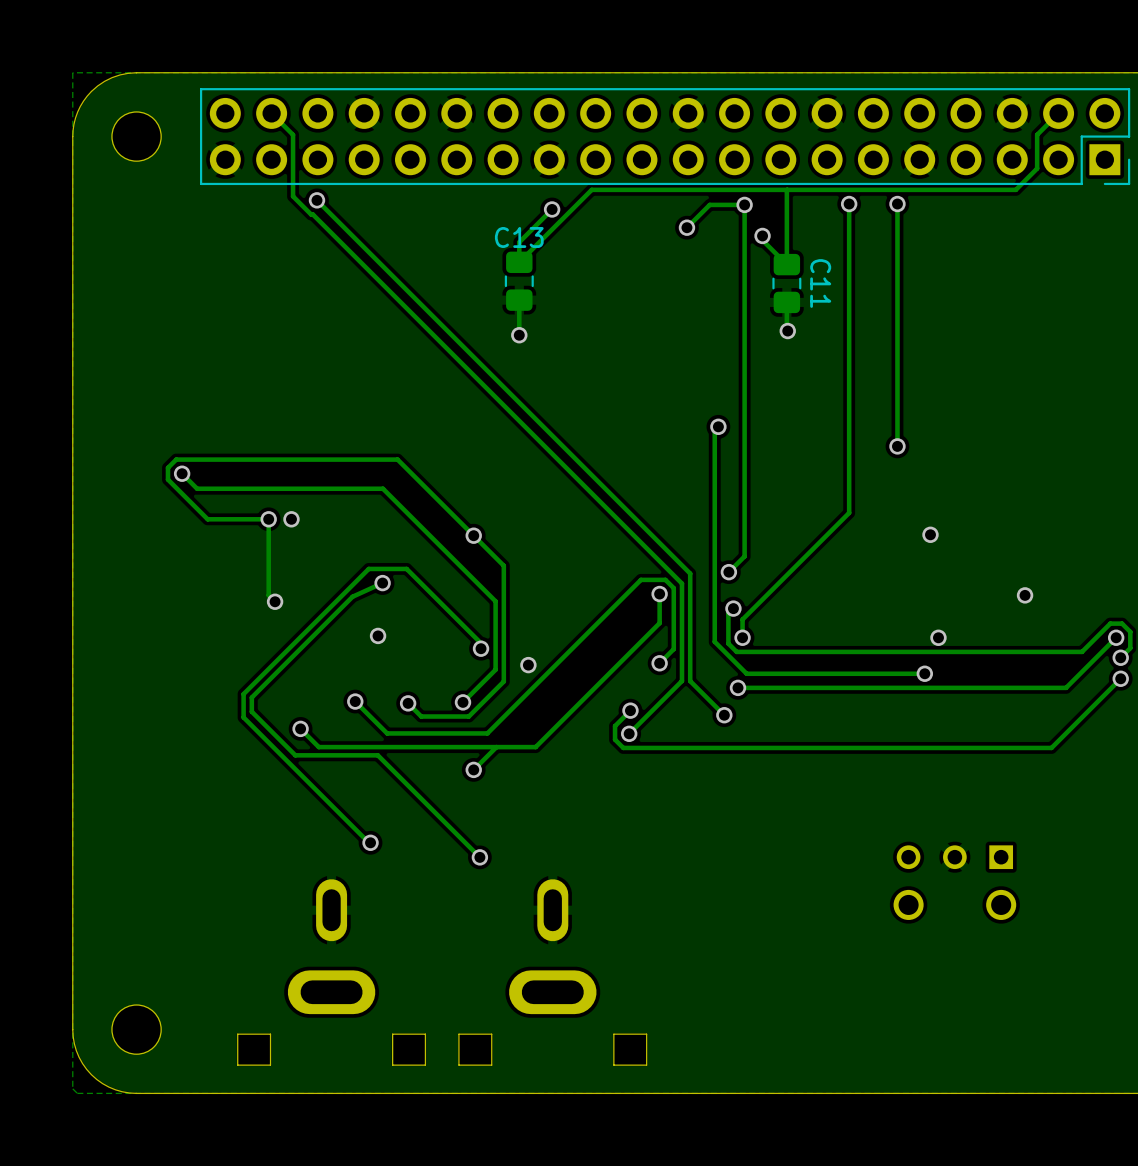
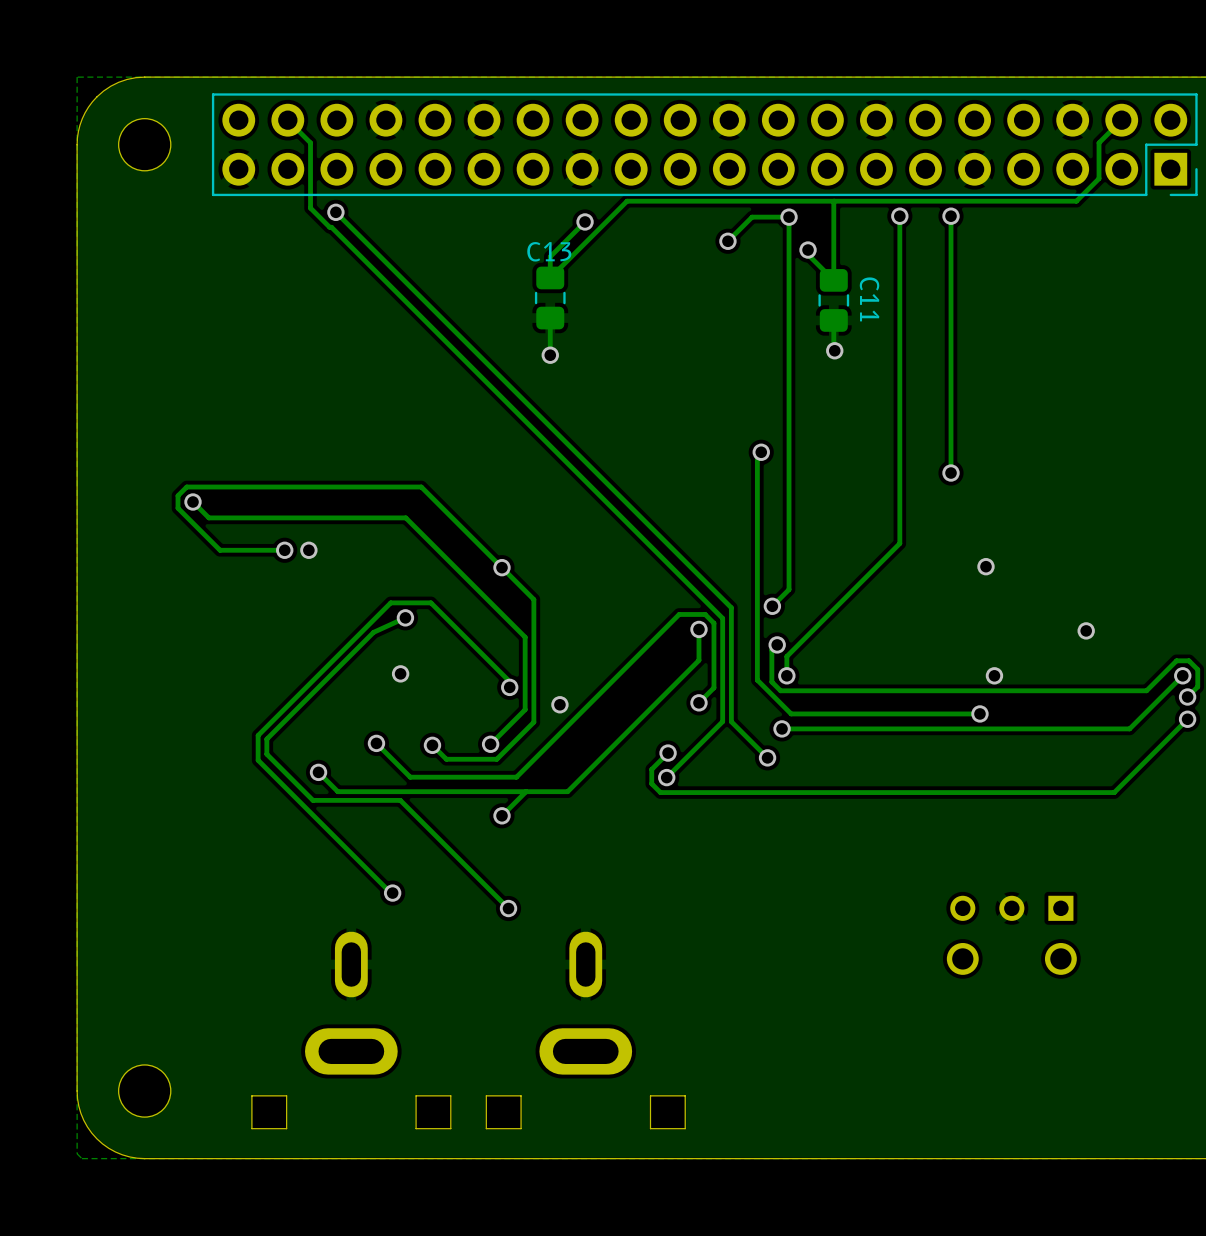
track: (268, 519) (268, 595) (275, 601) -> none
via: (275, 601) -> none

